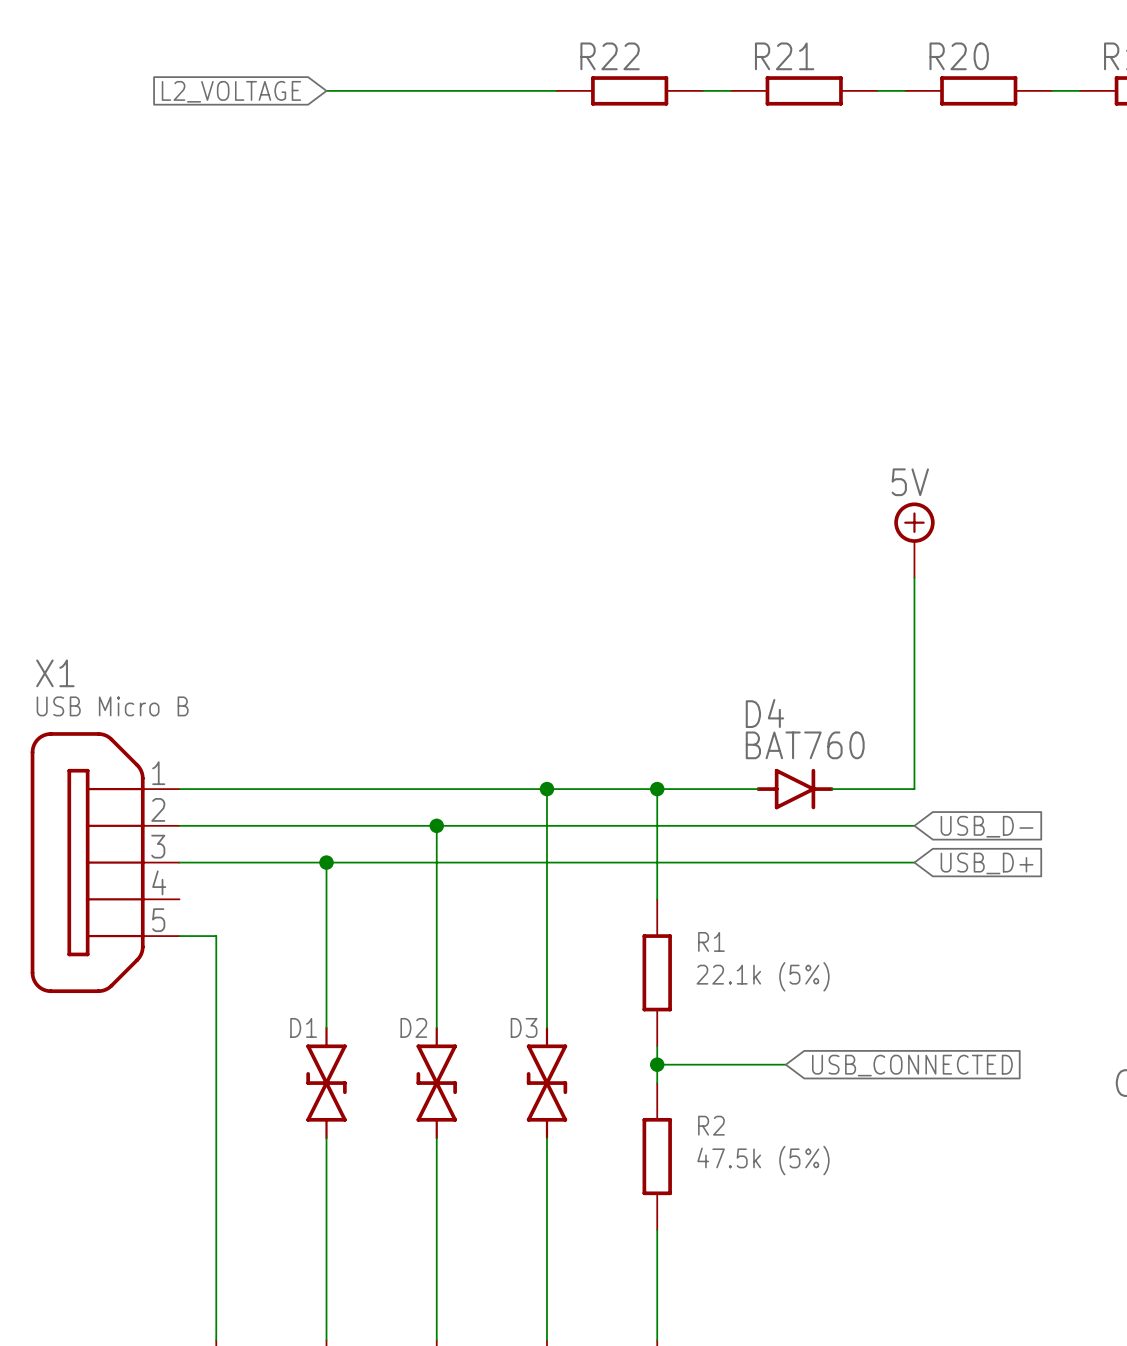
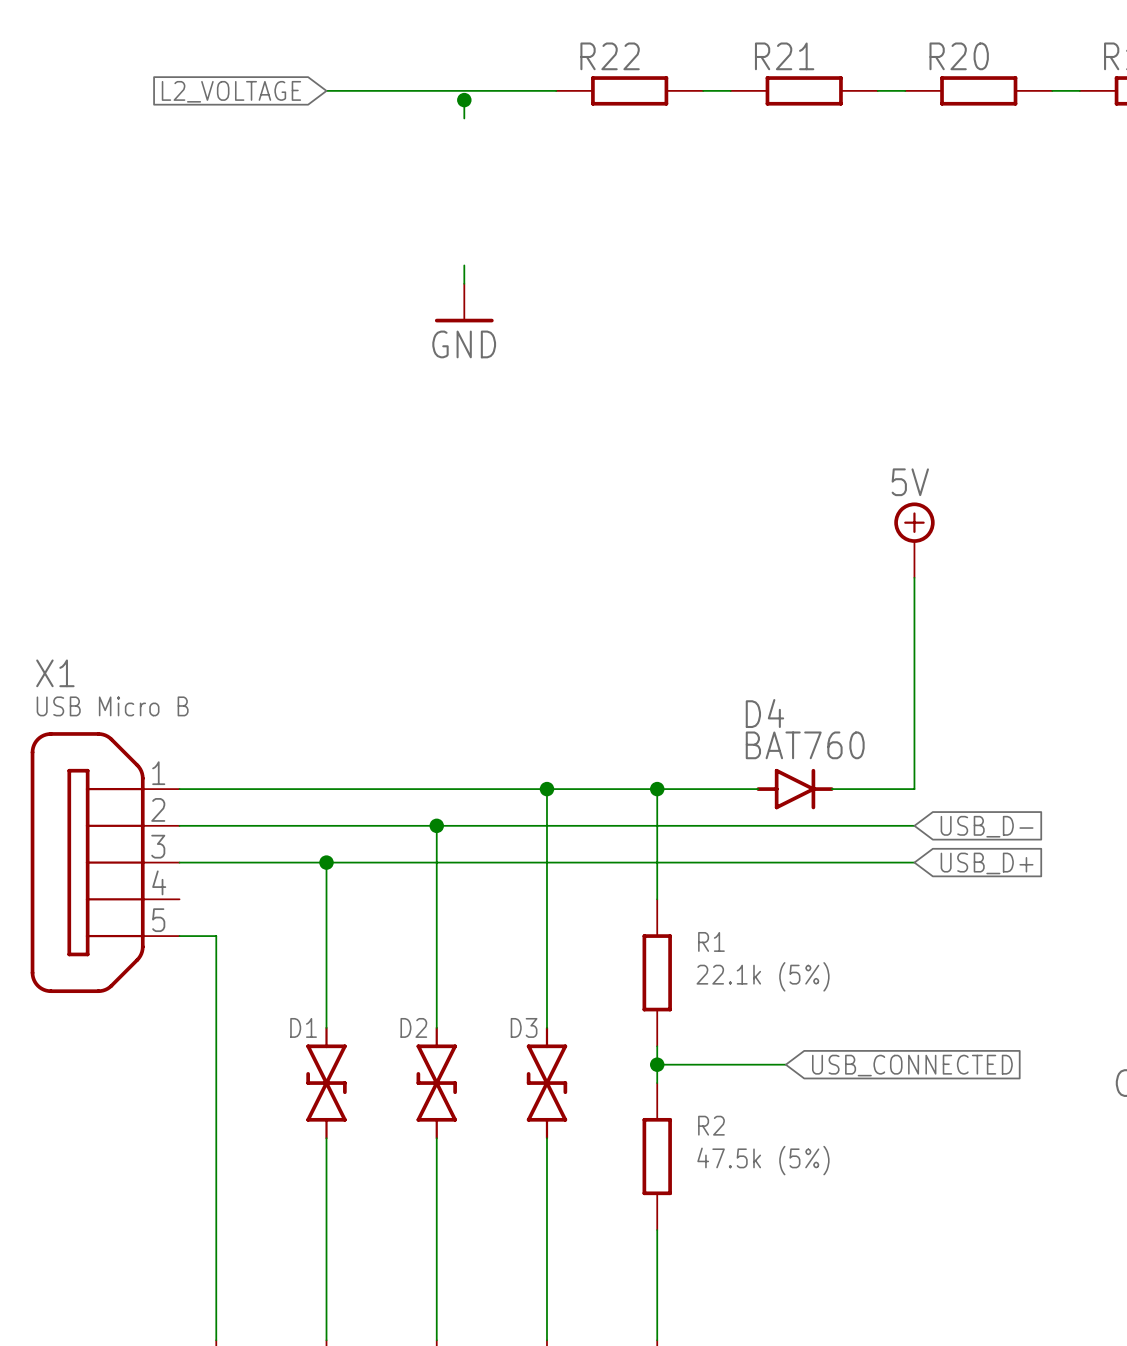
wire: none -> (464, 100) (464, 118)
junction: none -> (464, 100)
wire: none -> (464, 265) (464, 283)
power symbol: none -> GND (464, 303)

